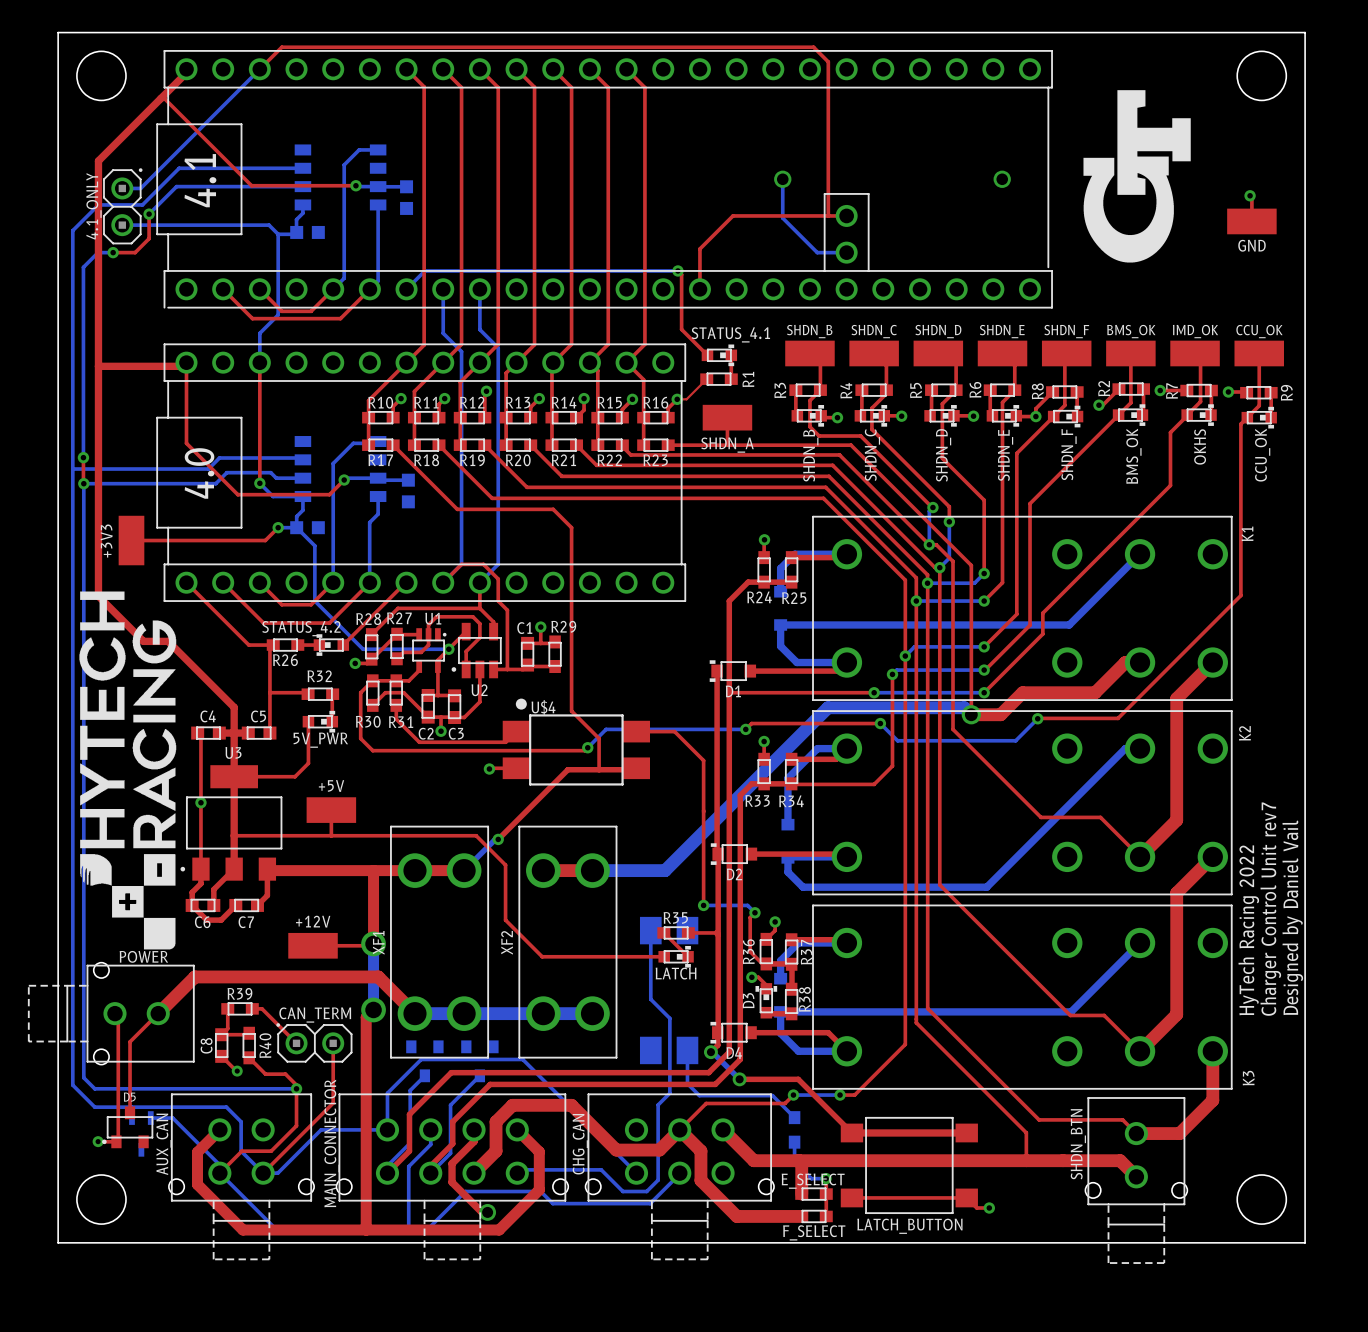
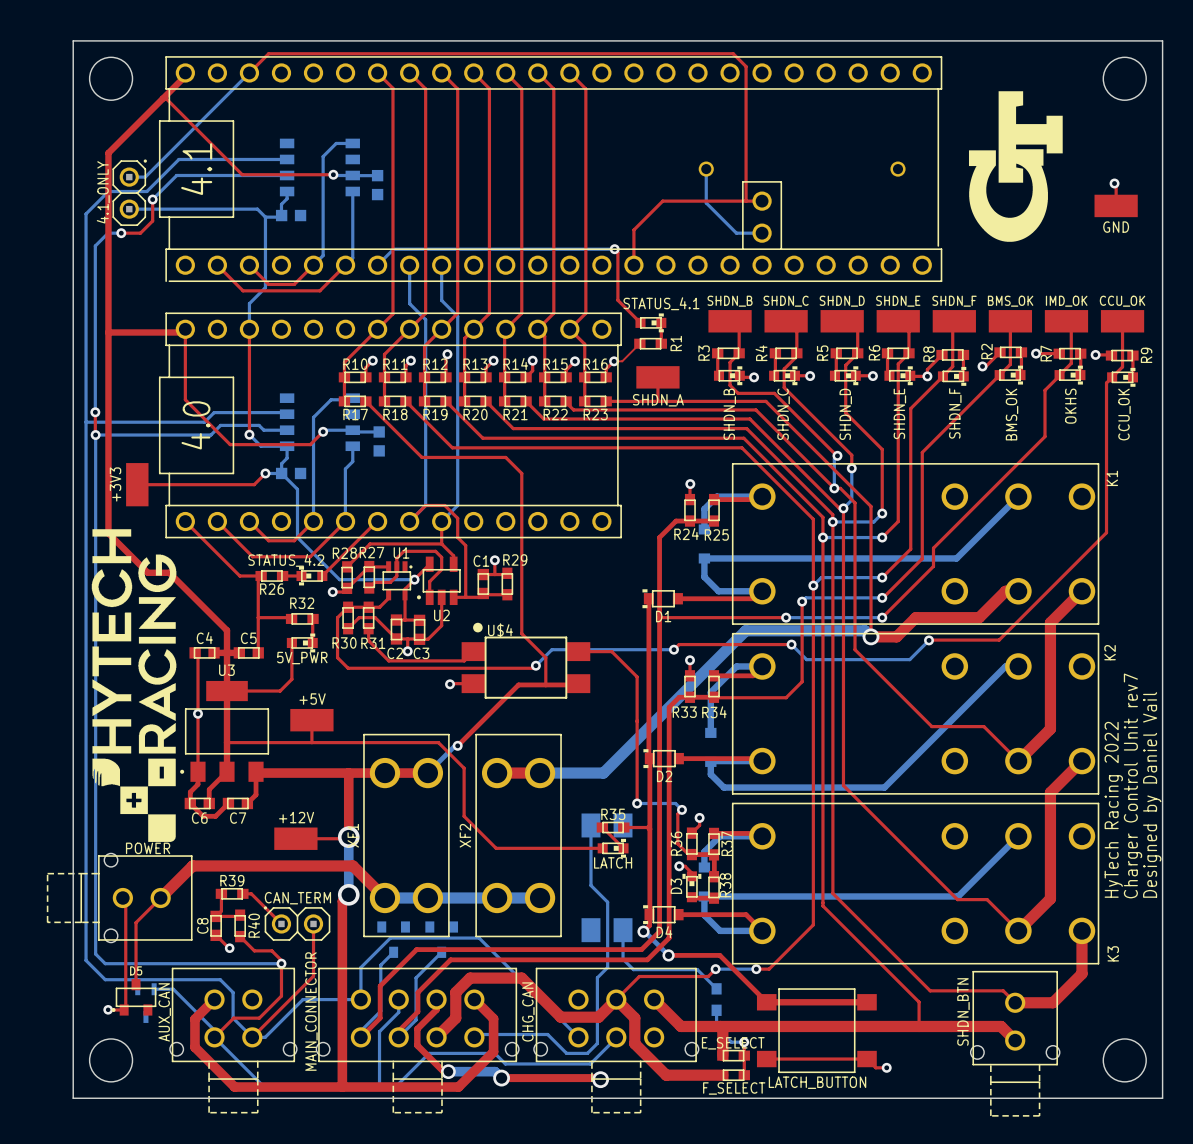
bottom track: none -> (448, 1071) (495, 1071) (501, 1078)
top track: none -> (501, 1078) (599, 1078) (600, 1079)
via: none -> (501, 1078)
via: none -> (600, 1079)

